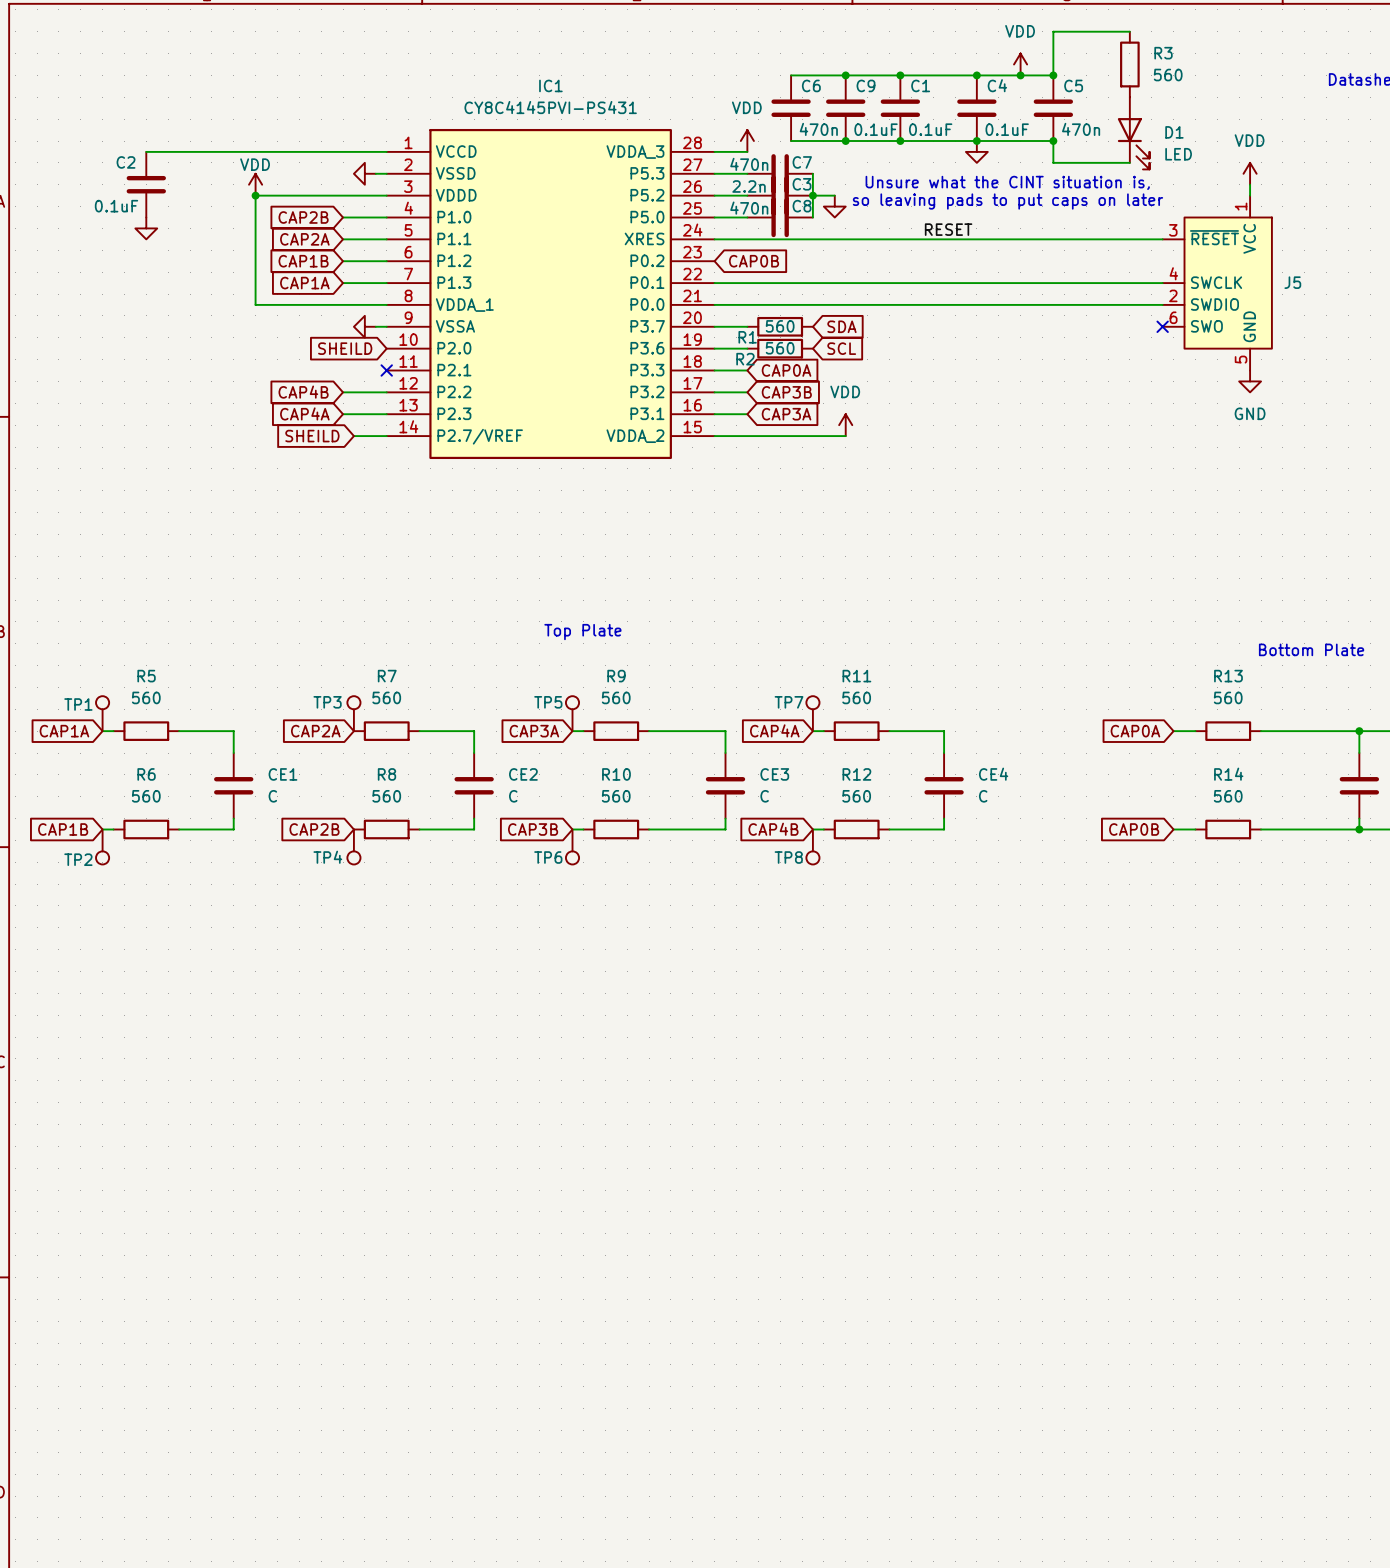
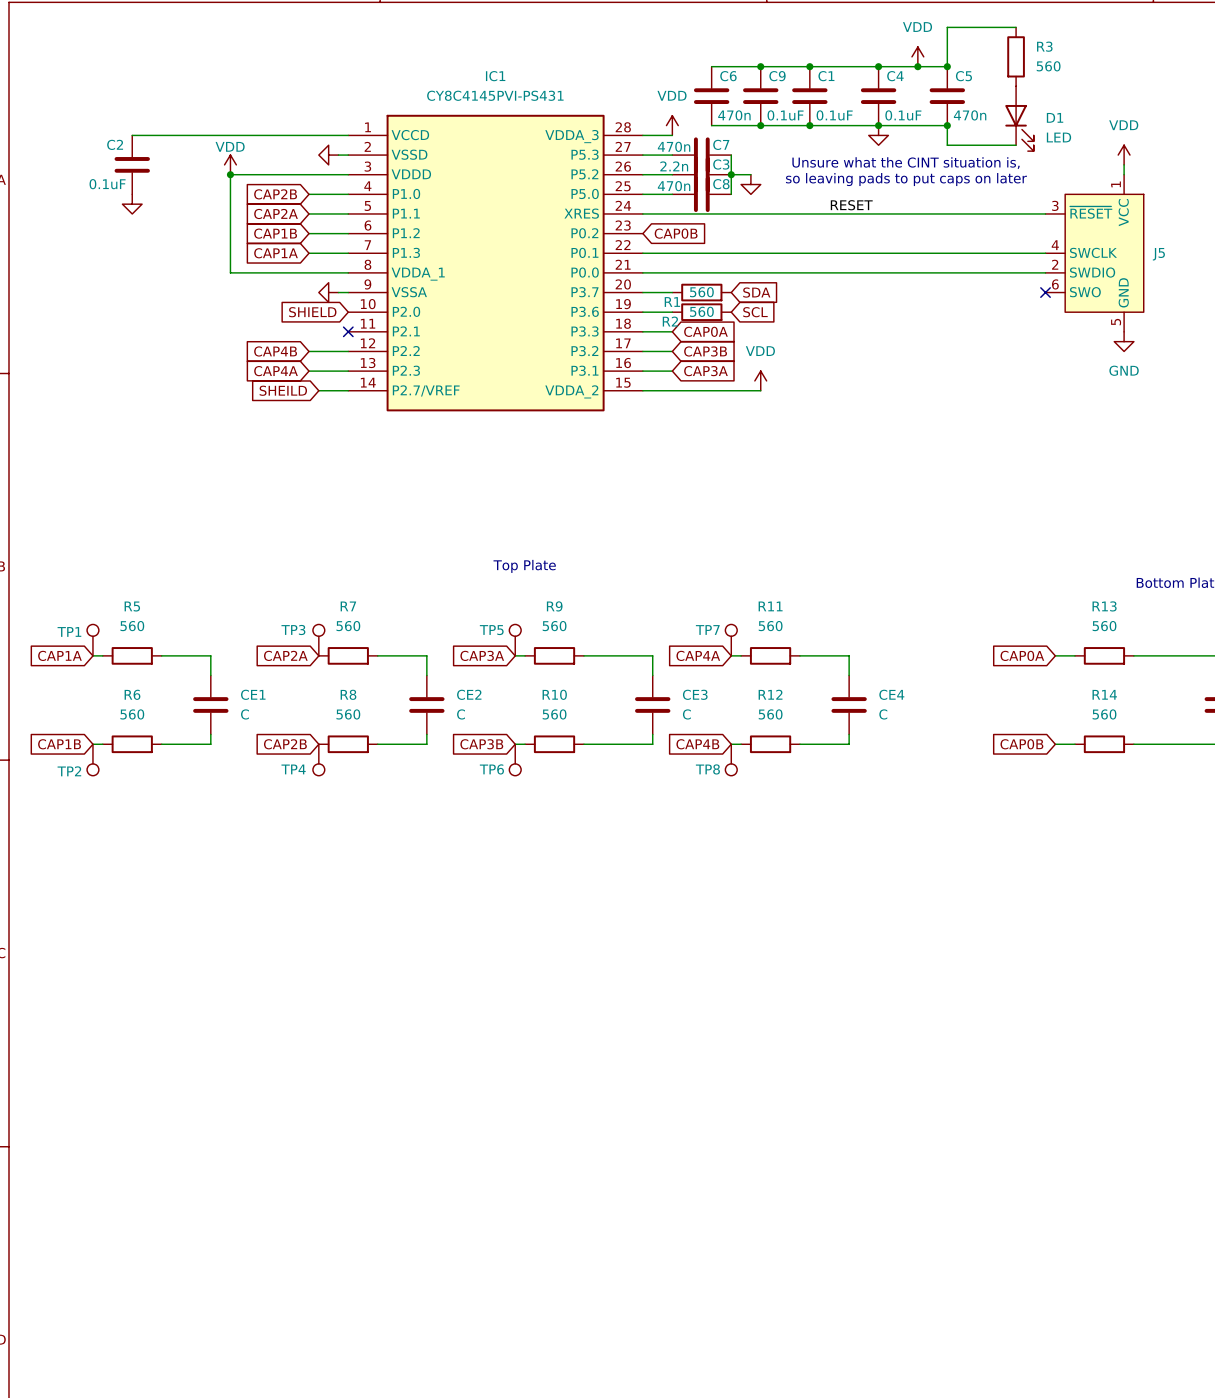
global label: SHEILD (345, 348) -> SHIELD (312, 312)

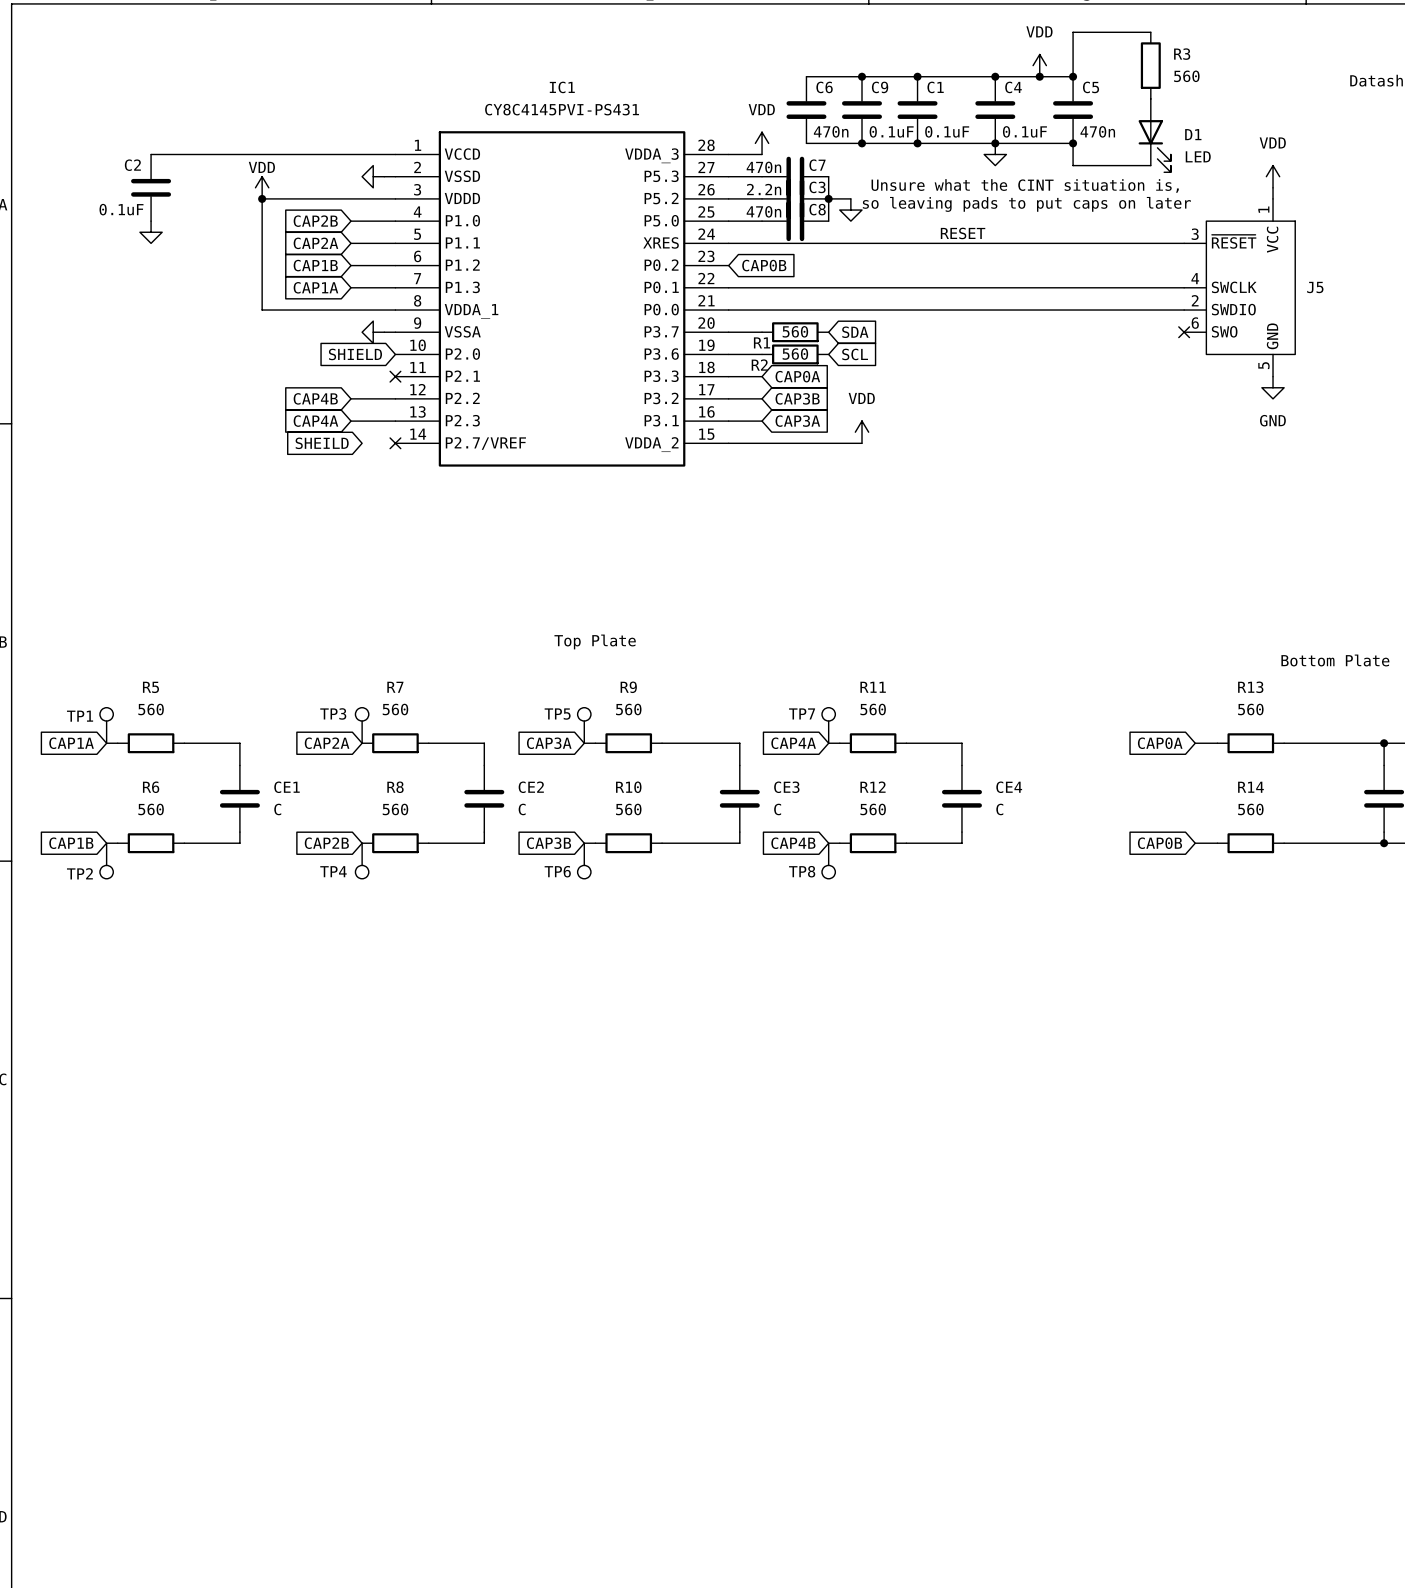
wire: (318, 390) (348, 390) -> none
no-connect mark: none -> (395, 443)

